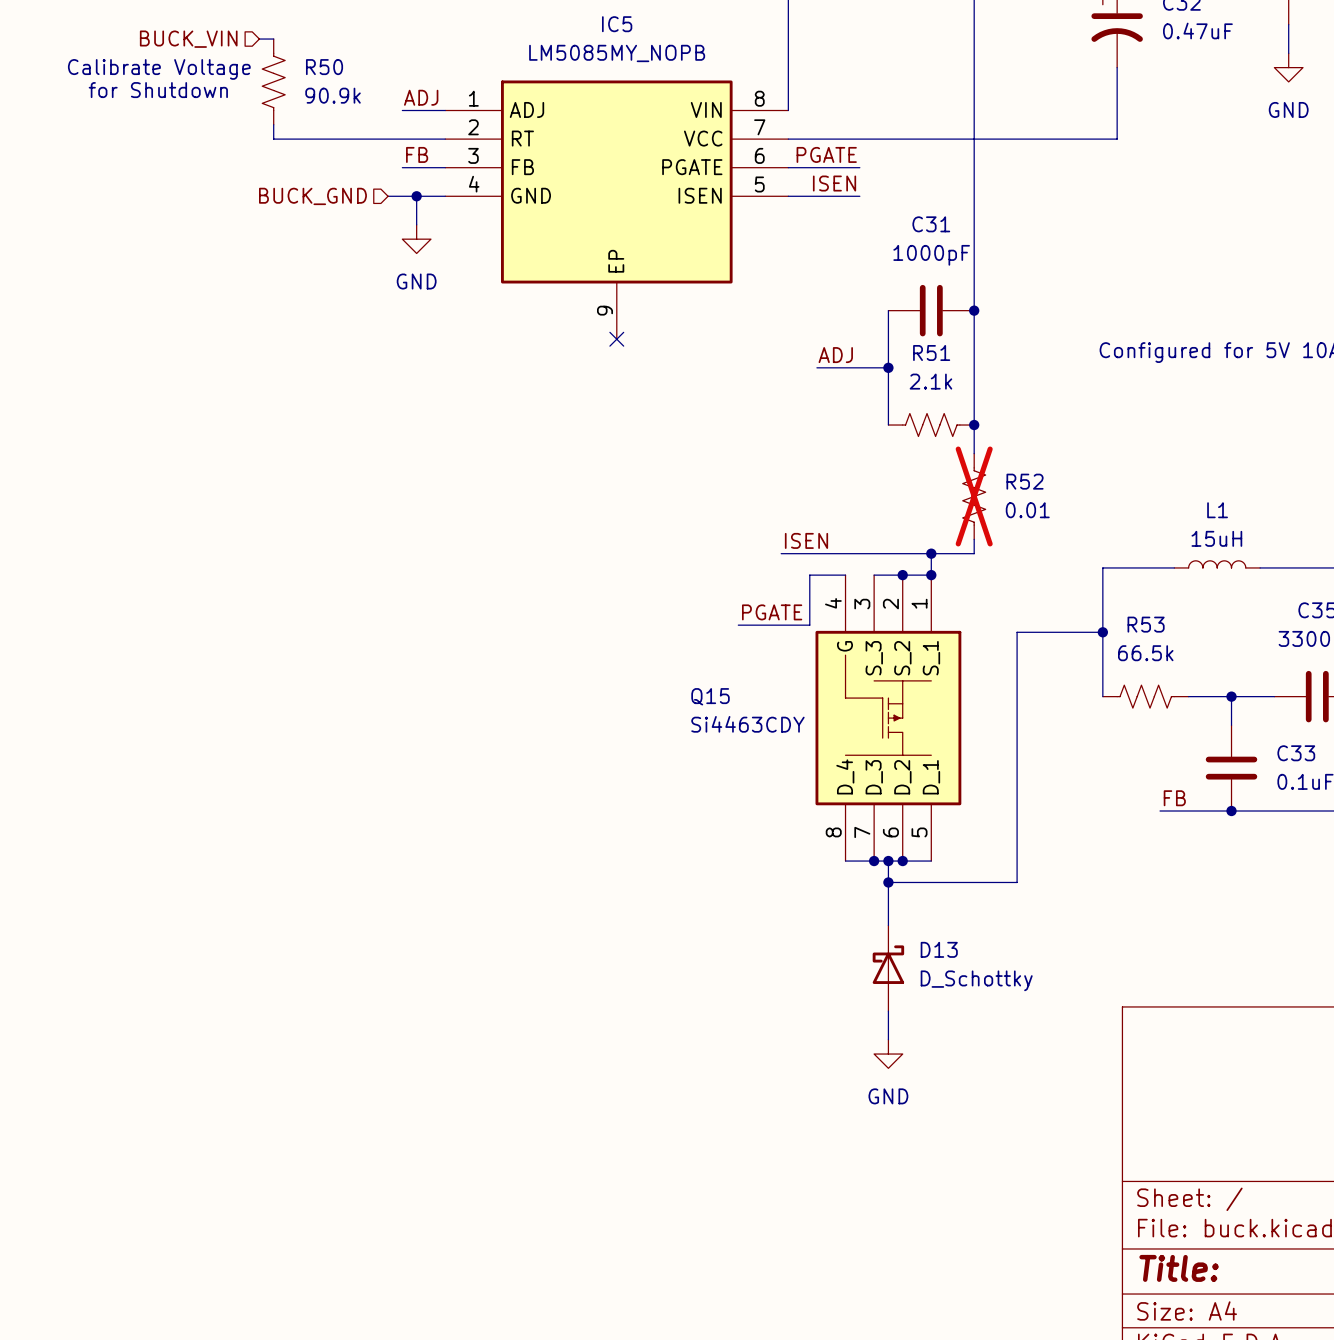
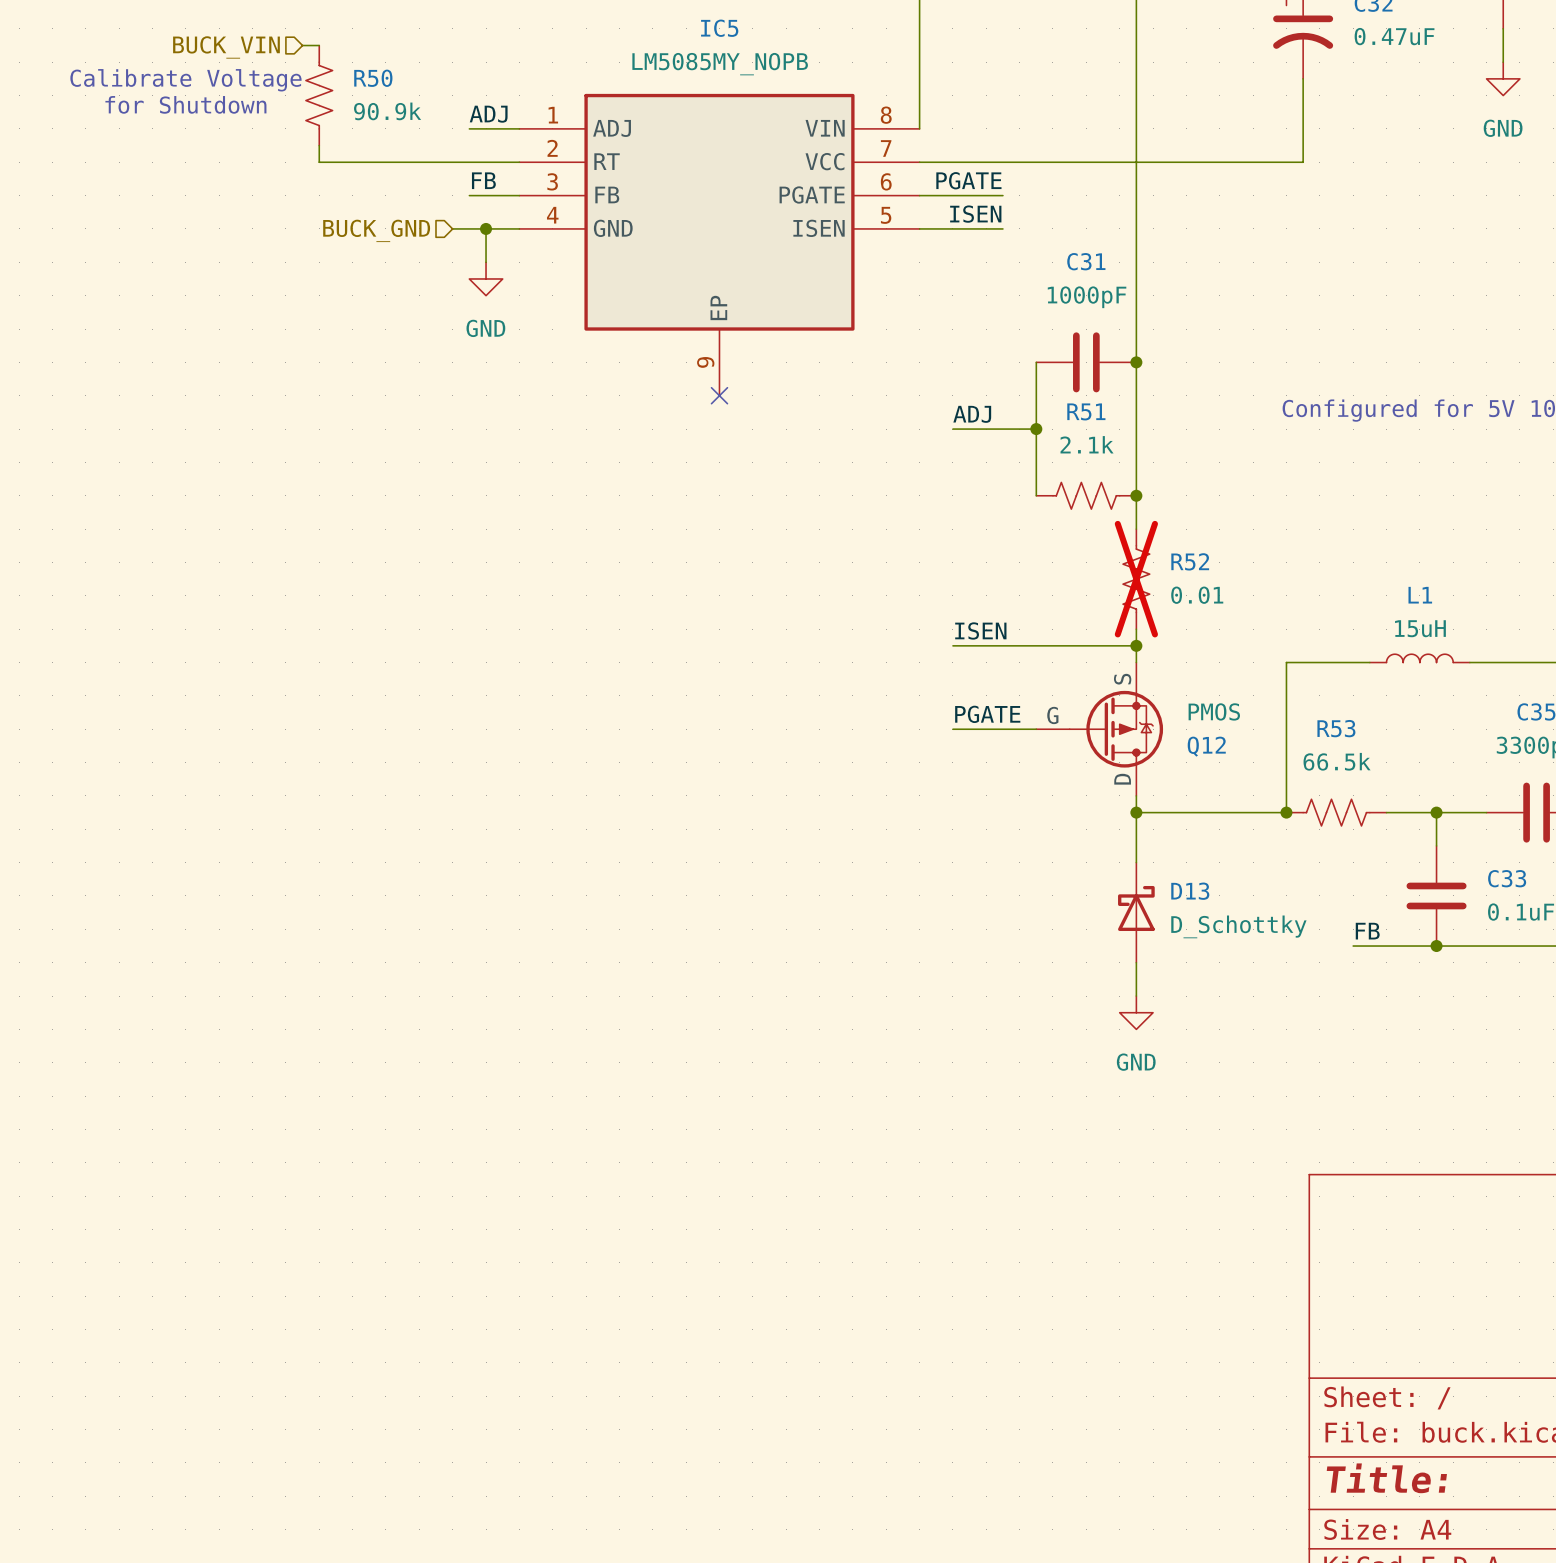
label position: ISEN (806, 540) -> ISEN (980, 630)
wire: (781, 553) (816, 553) -> none
wire: (931, 553) (931, 575) (874, 575) -> none
junction: (931, 553) -> none
wire: none -> (1136, 645) (1136, 662)
junction: none -> (1136, 645)
wire: (845, 575) (809, 575) (809, 625) (738, 625) -> none
junction: (902, 575) -> none
junction: (931, 575) -> none
label position: PGATE (772, 612) -> PGATE (987, 714)
wire: none -> (952, 729) (1036, 729)
Q12: none -> PMOS (1099, 729)
wire: (1102, 632) (1017, 632) (1017, 882) (888, 882) -> none
junction position: (1102, 632) -> (1286, 812)
wire: none -> (1136, 795) (1136, 862)
wire: none -> (1136, 812) (1286, 812)
junction: none -> (1136, 812)
Q15: Si4463CDY (888, 718) -> none
wire: (845, 861) (931, 861) -> none
junction: (874, 861) -> none
wire: (888, 861) (888, 925) -> none
junction: (888, 861) -> none
junction: (902, 861) -> none
junction: (888, 882) -> none
D13 position: (888, 968) -> (1136, 912)
wire: (888, 1011) (888, 1039) -> (1136, 962) (1136, 996)
power symbol position: GND (888, 1054) -> GND (1136, 1012)

